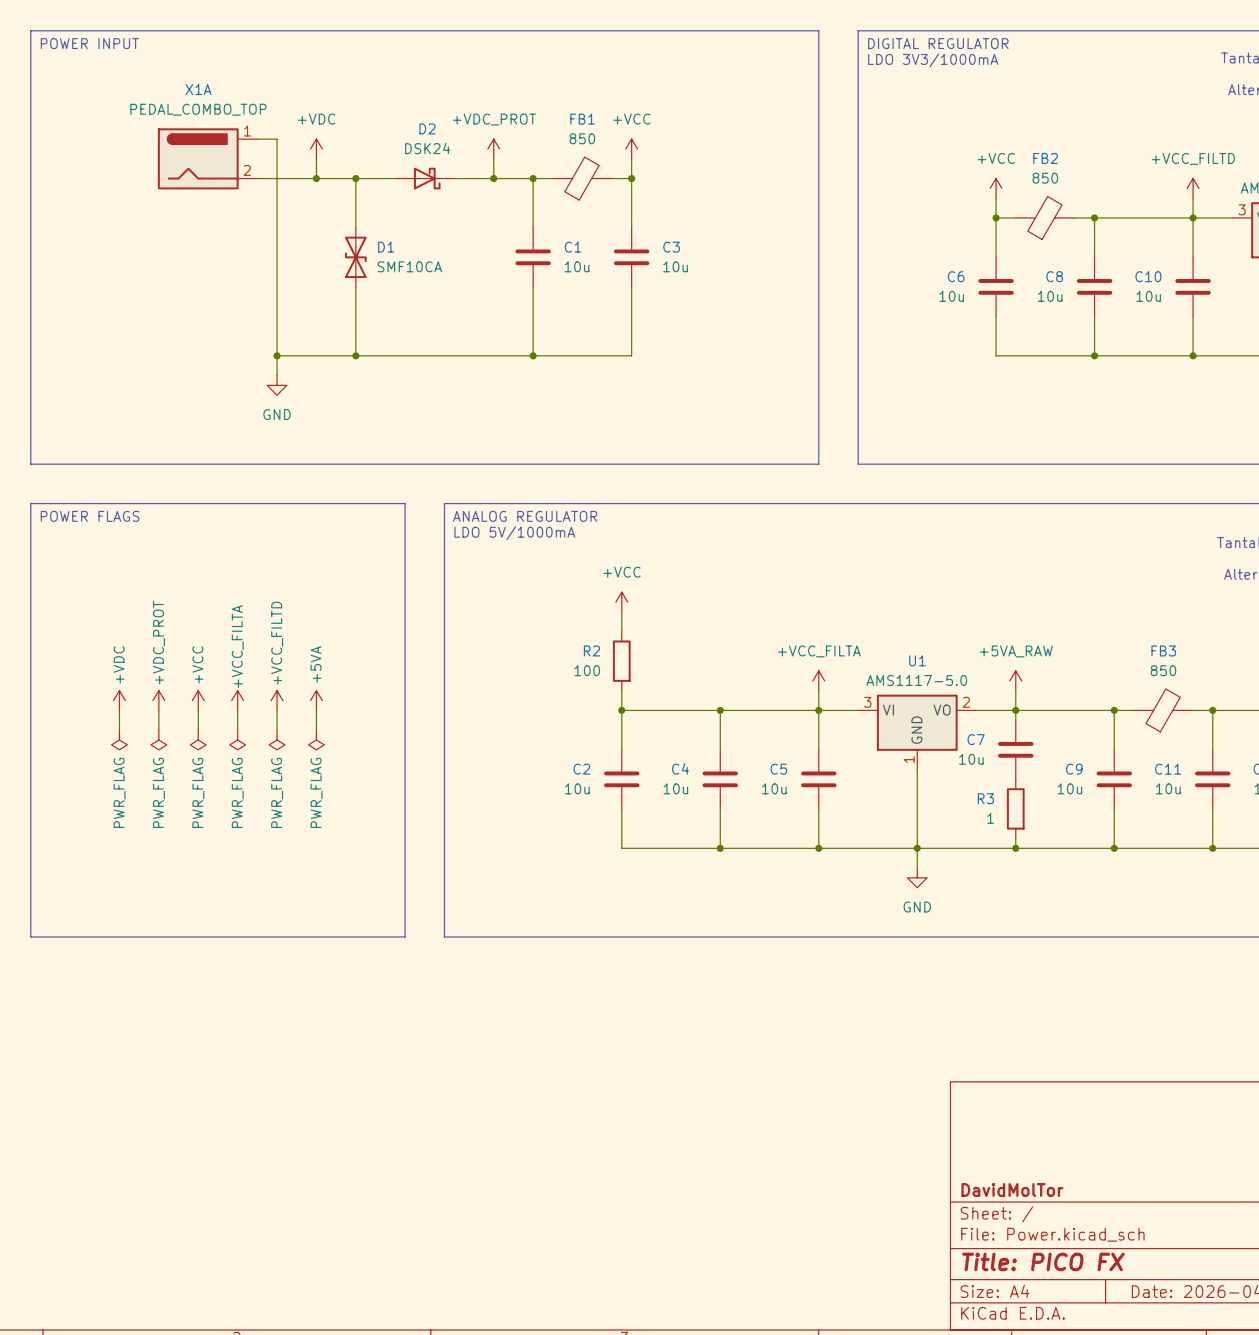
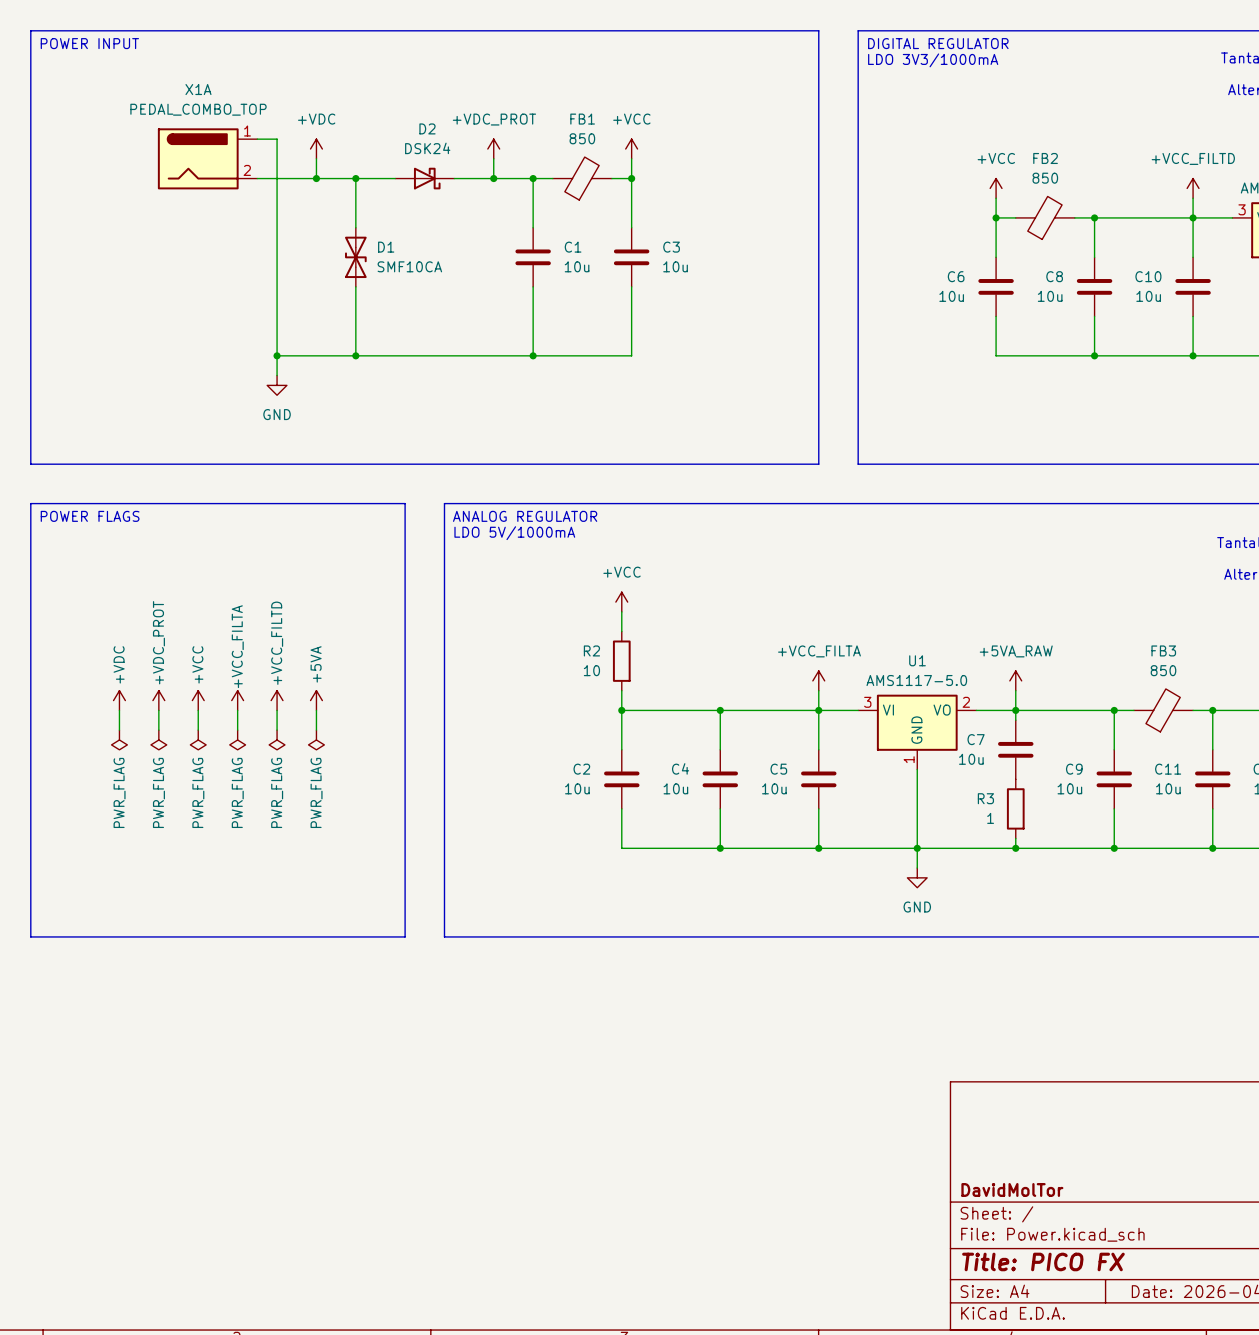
R2 value: 100 (587, 670) -> 10 (591, 670)

